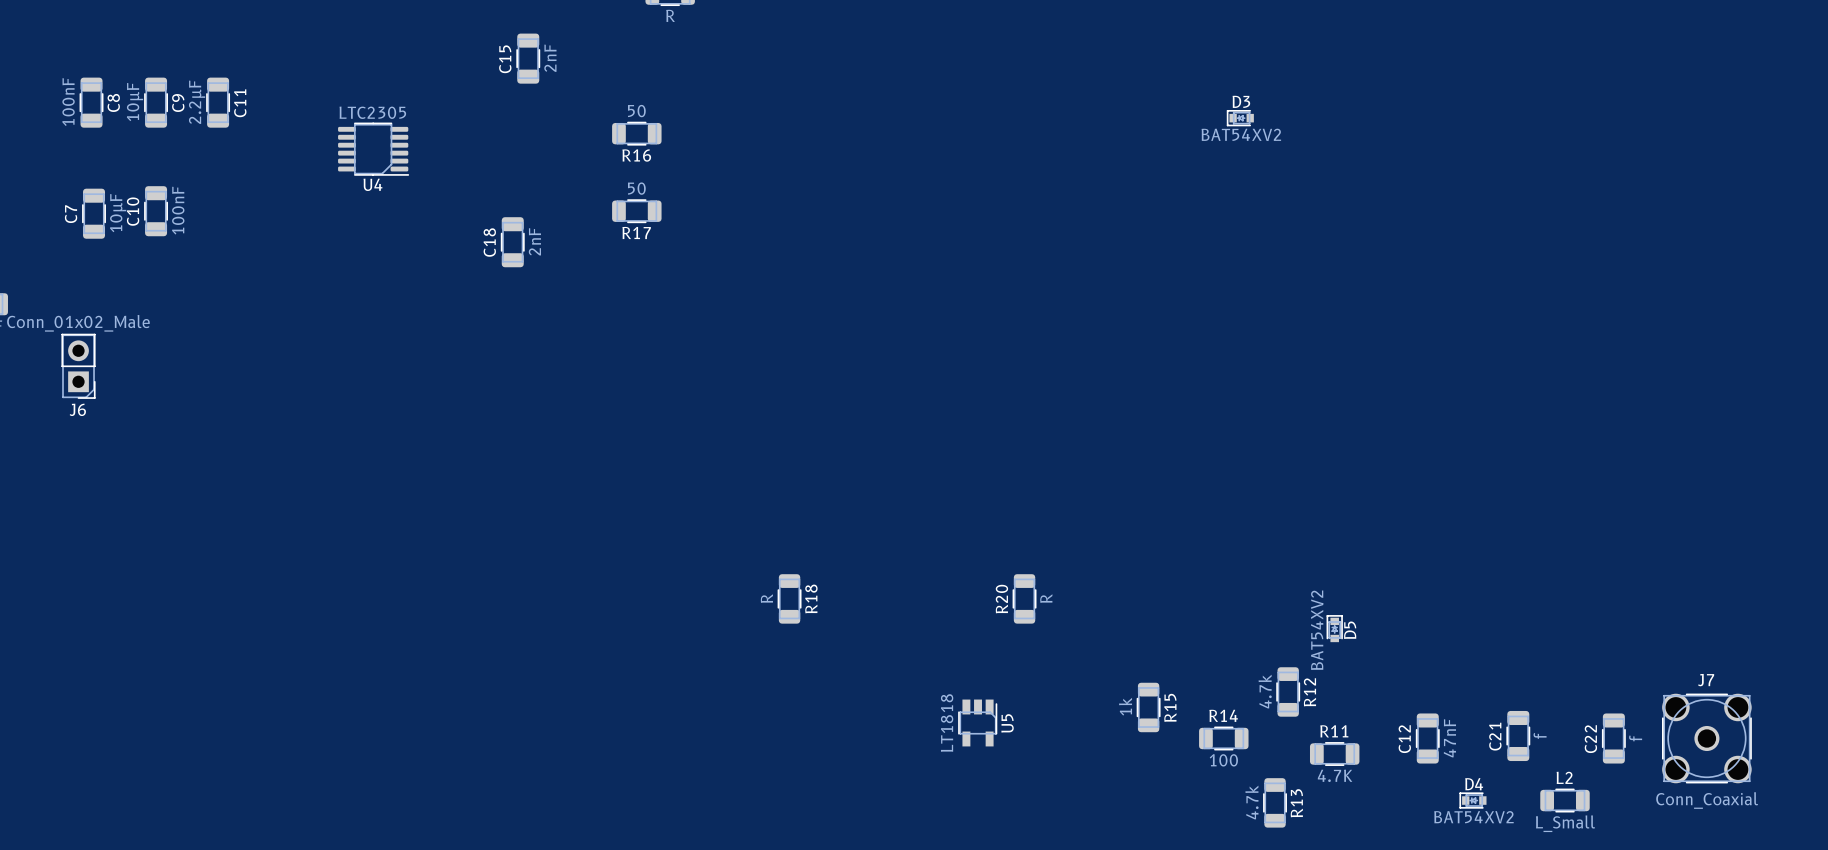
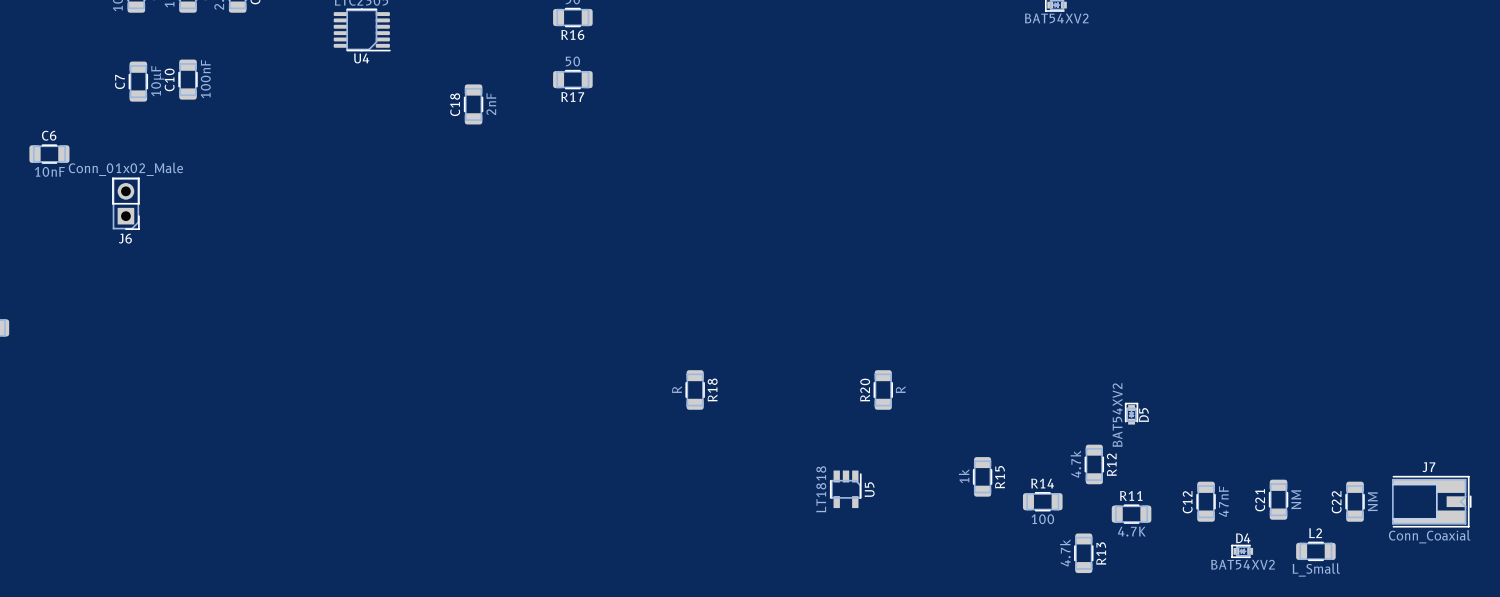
J7 footprint: [1662, 693, 1752, 784] -> [1392, 476, 1472, 528]
C21 value: f (1540, 735) -> NM (1296, 499)
C22 value: f (1635, 738) -> NM (1372, 501)

